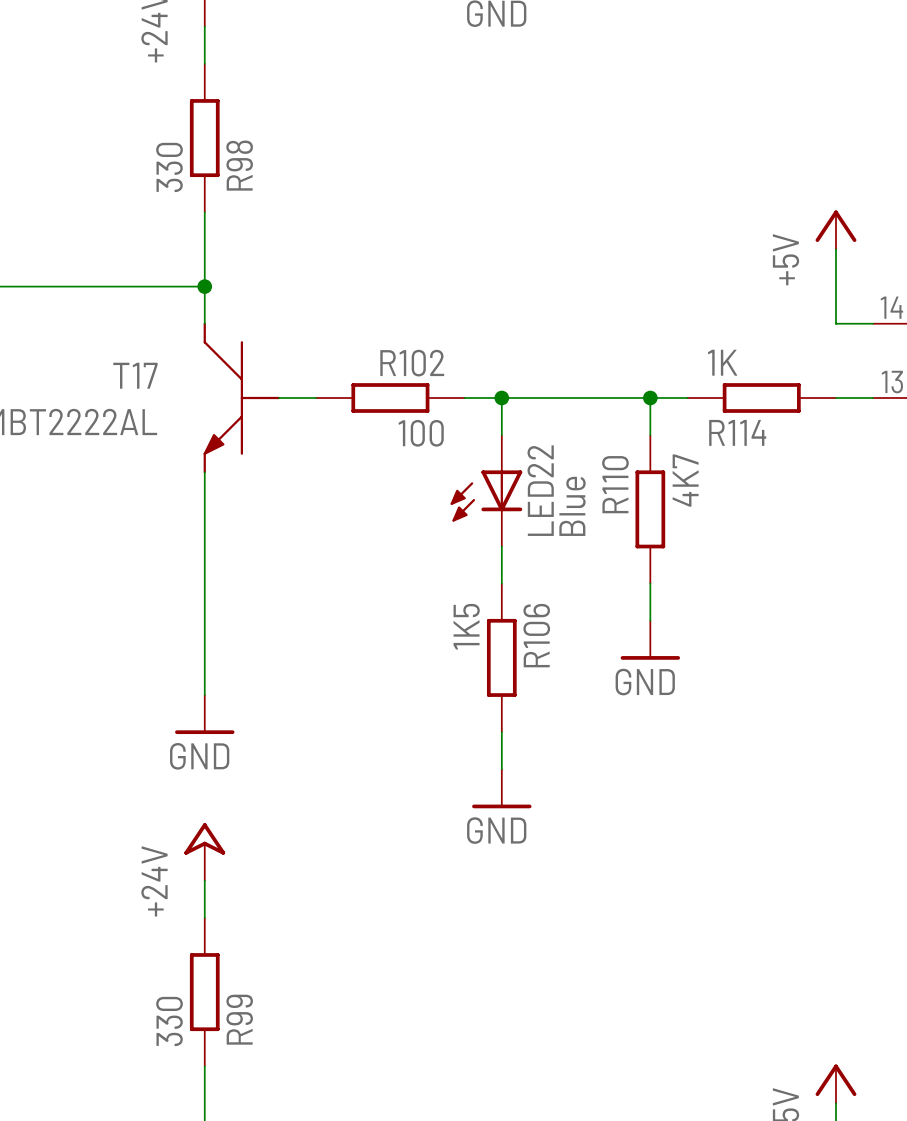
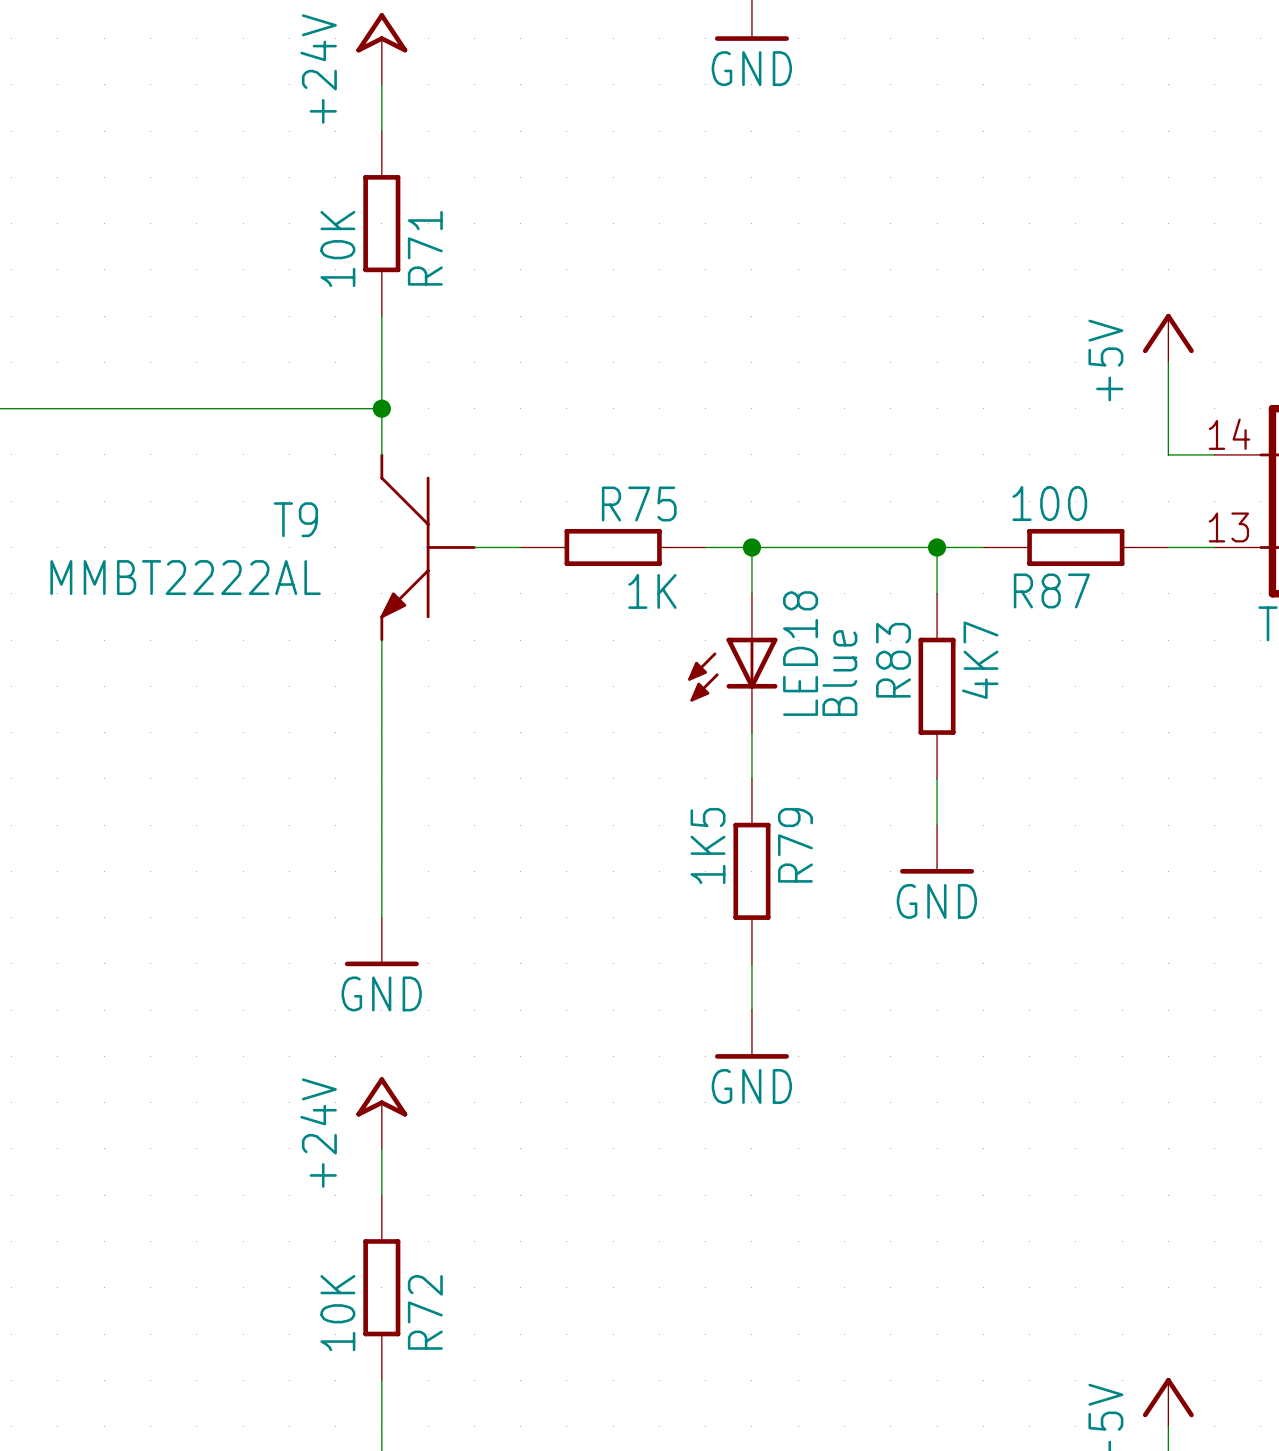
R98 name: R98 (239, 165) -> R71 (425, 248)
R98 value: 330 (169, 167) -> 10K (337, 248)
R114 value: 1K (722, 362) -> 100 (1049, 503)
R102 name: R102 (412, 363) -> R75 (639, 503)
T17 name: T17 (135, 375) -> T9 (295, 519)
R114 name: R114 (737, 432) -> R87 (1051, 590)
R102 value: 100 (421, 433) -> 1K (652, 591)
R110 name: R110 (615, 484) -> R83 (893, 660)
LED22 name: LED22 (540, 490) -> LED18 (800, 653)
R106 name: R106 (536, 635) -> R79 (795, 845)
R99 name: R99 (239, 1019) -> R72 (425, 1312)
R99 value: 330 (169, 1021) -> 10K (337, 1313)

